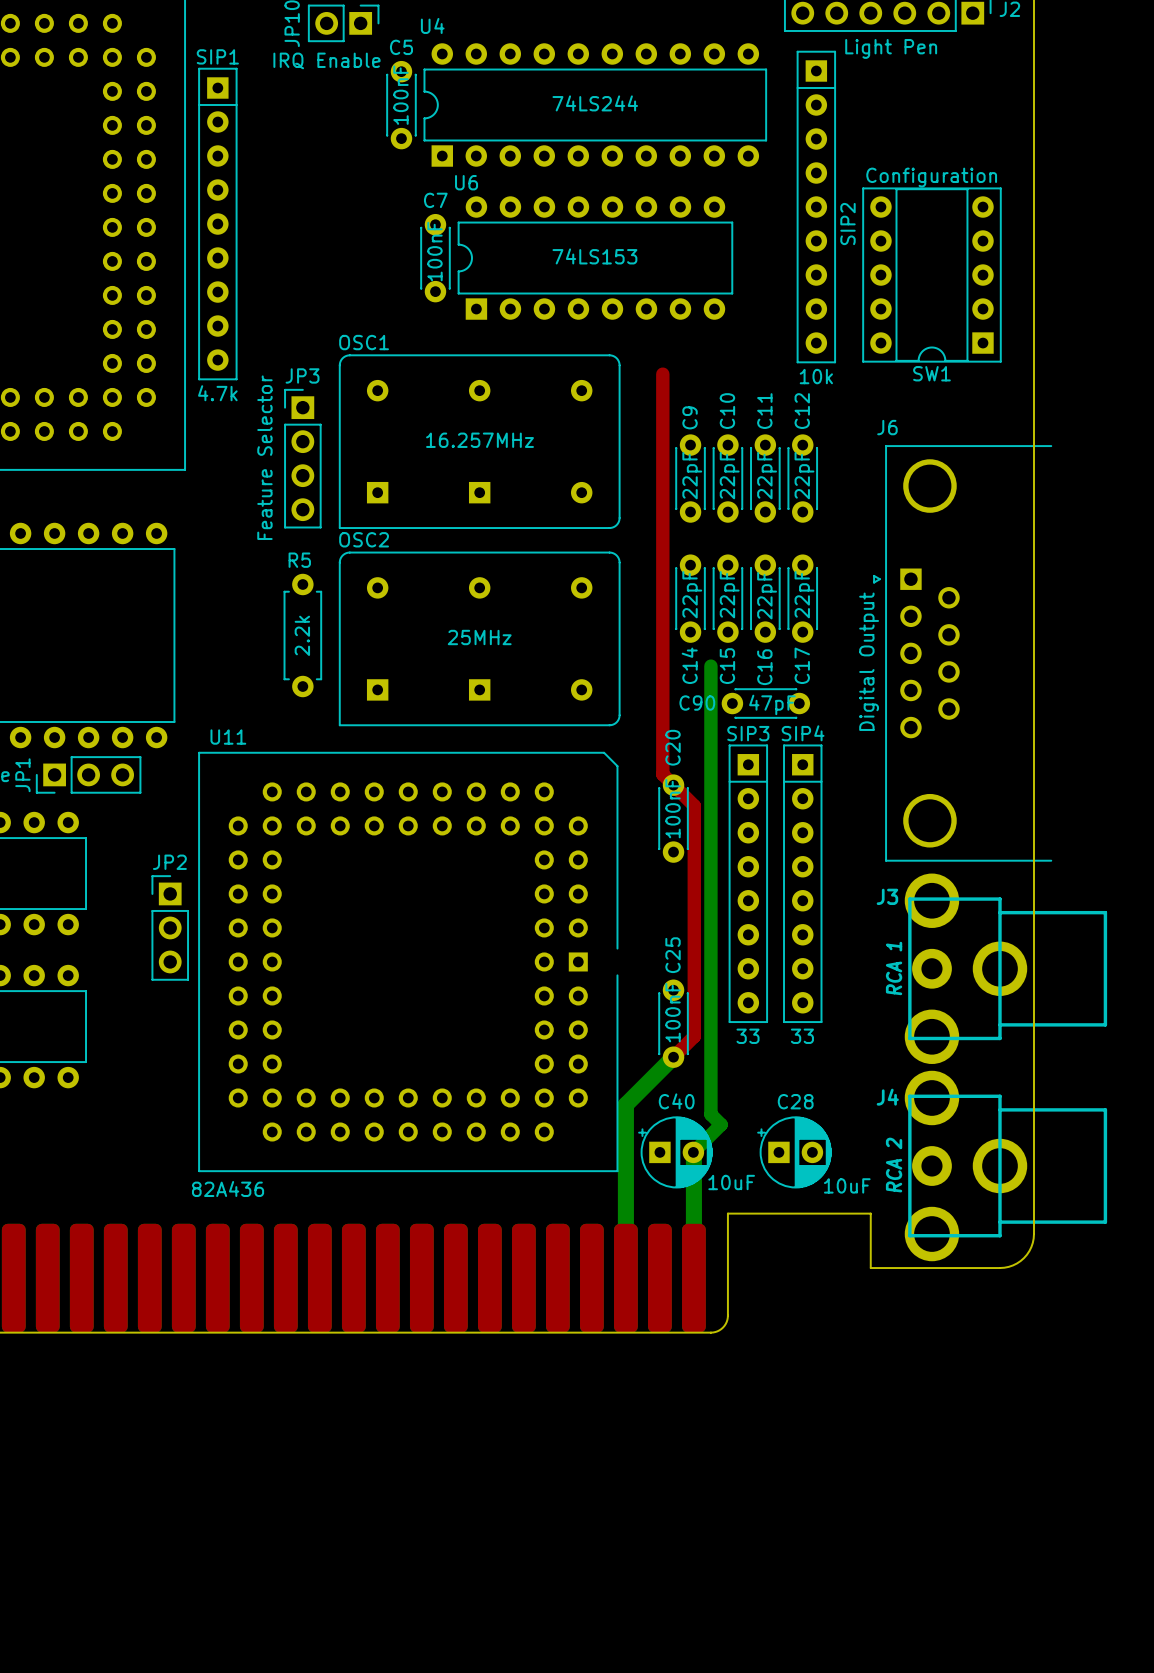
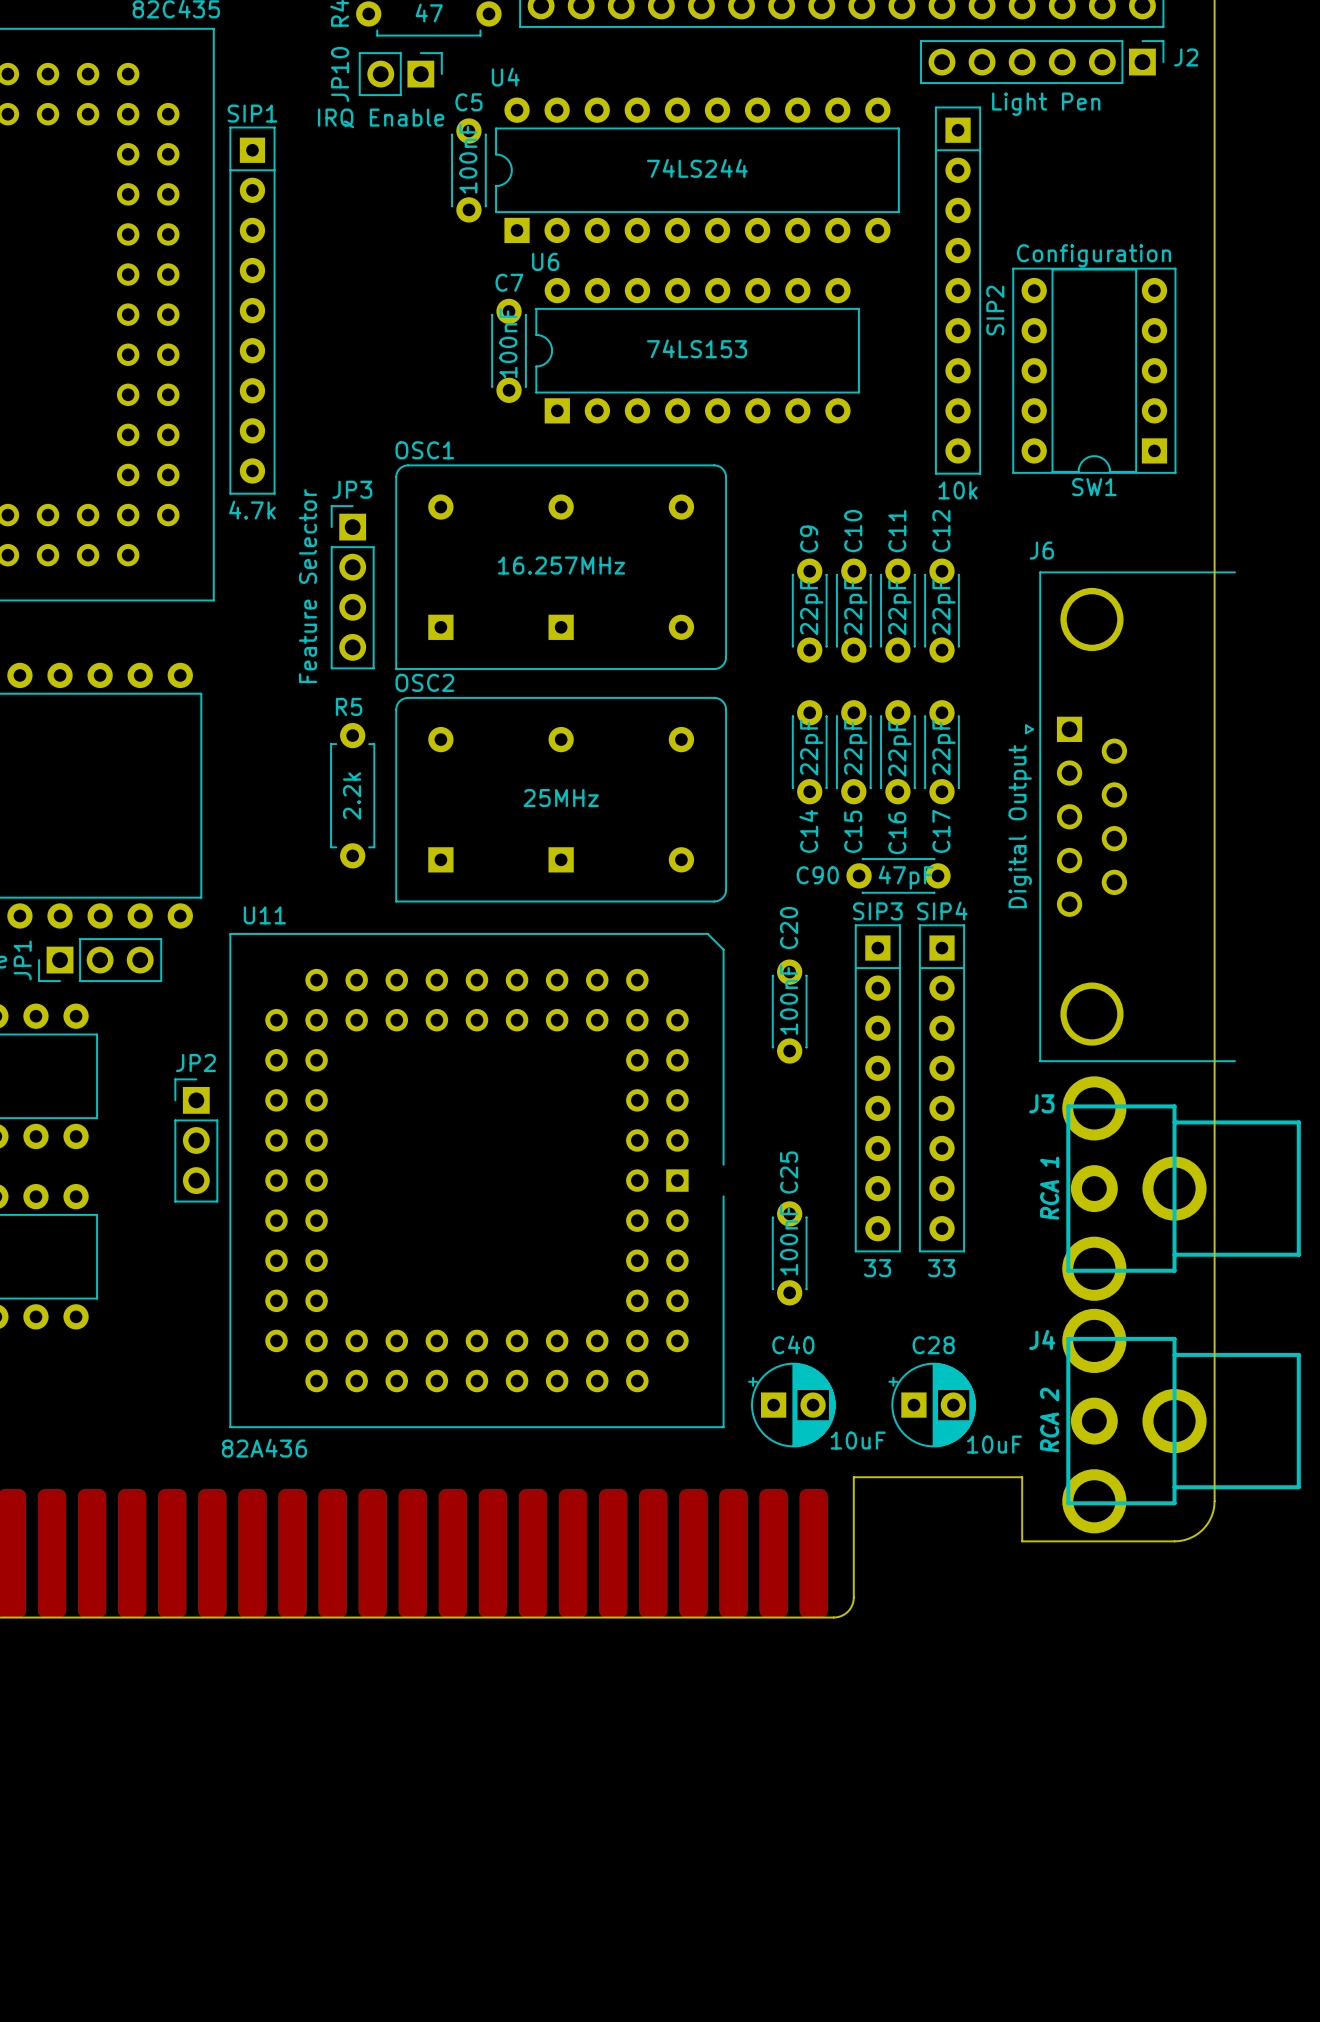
top track: (662, 374) (662, 774) (694, 805) (694, 1036) (673, 1057) -> none
bottom track: (710, 666) (710, 1114) (721, 1124) (693, 1152) (693, 1278) -> none
bottom track: (673, 1057) (625, 1104) (625, 1278) -> none

